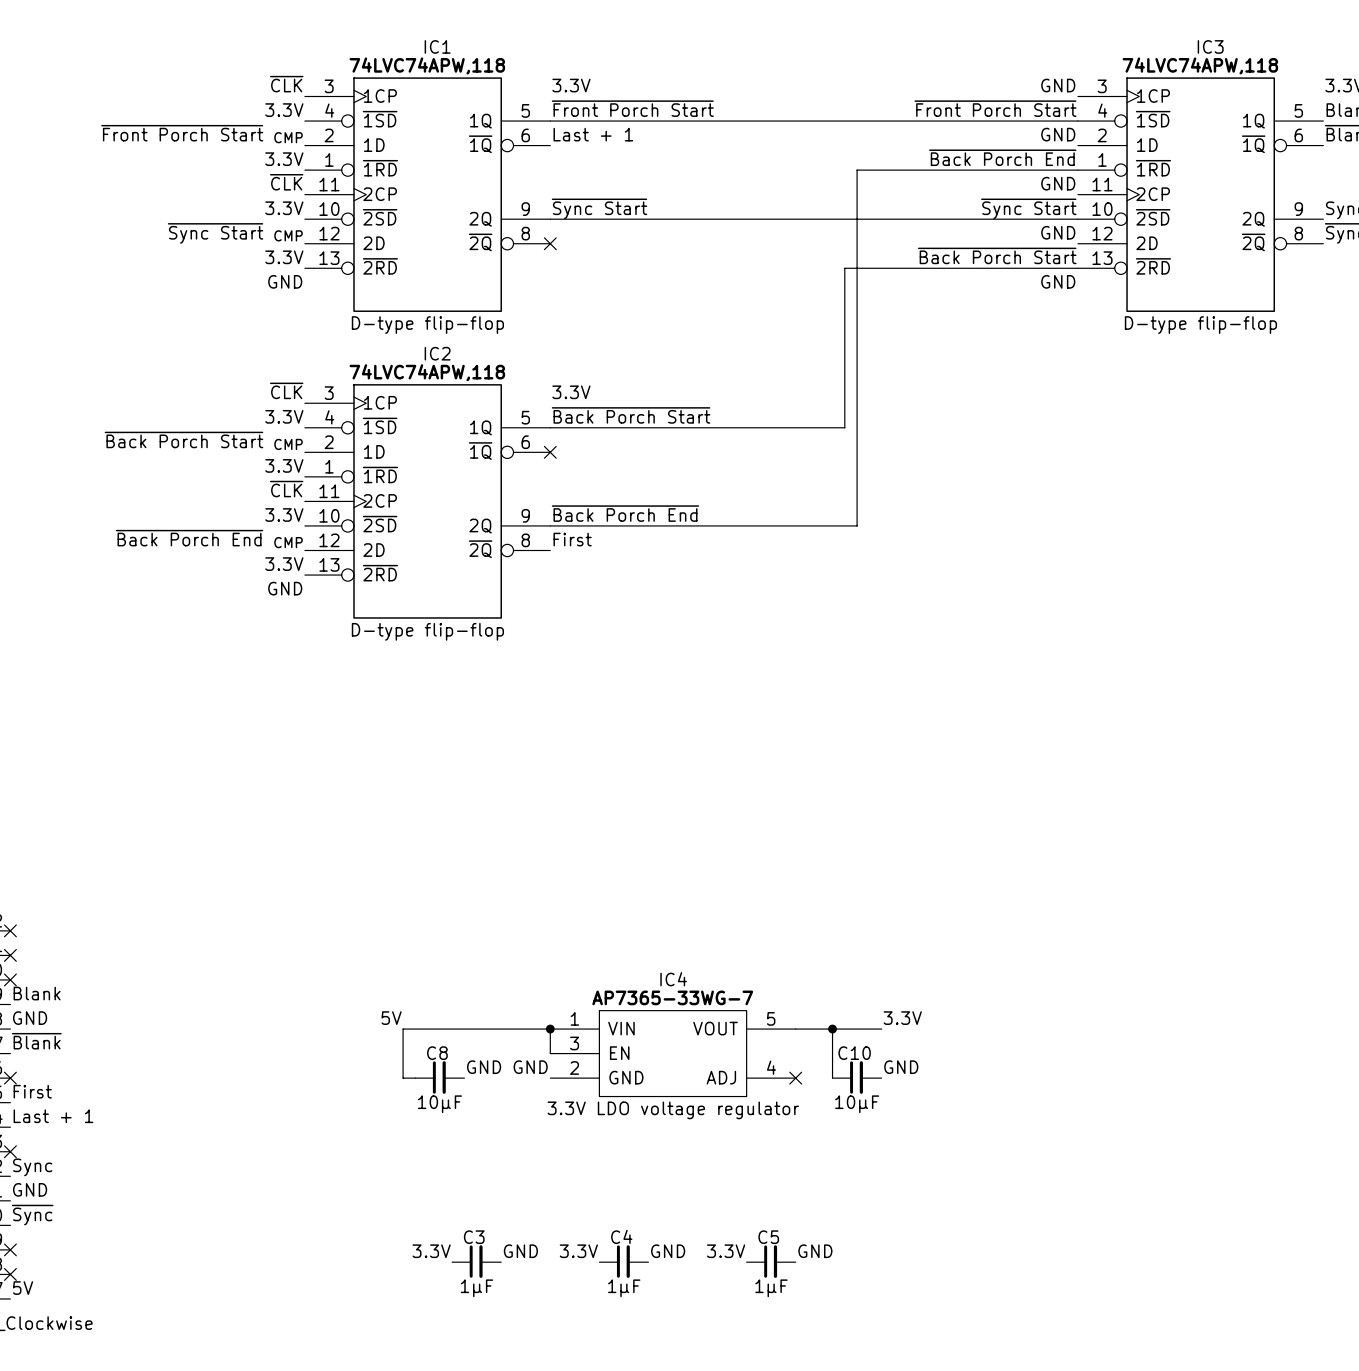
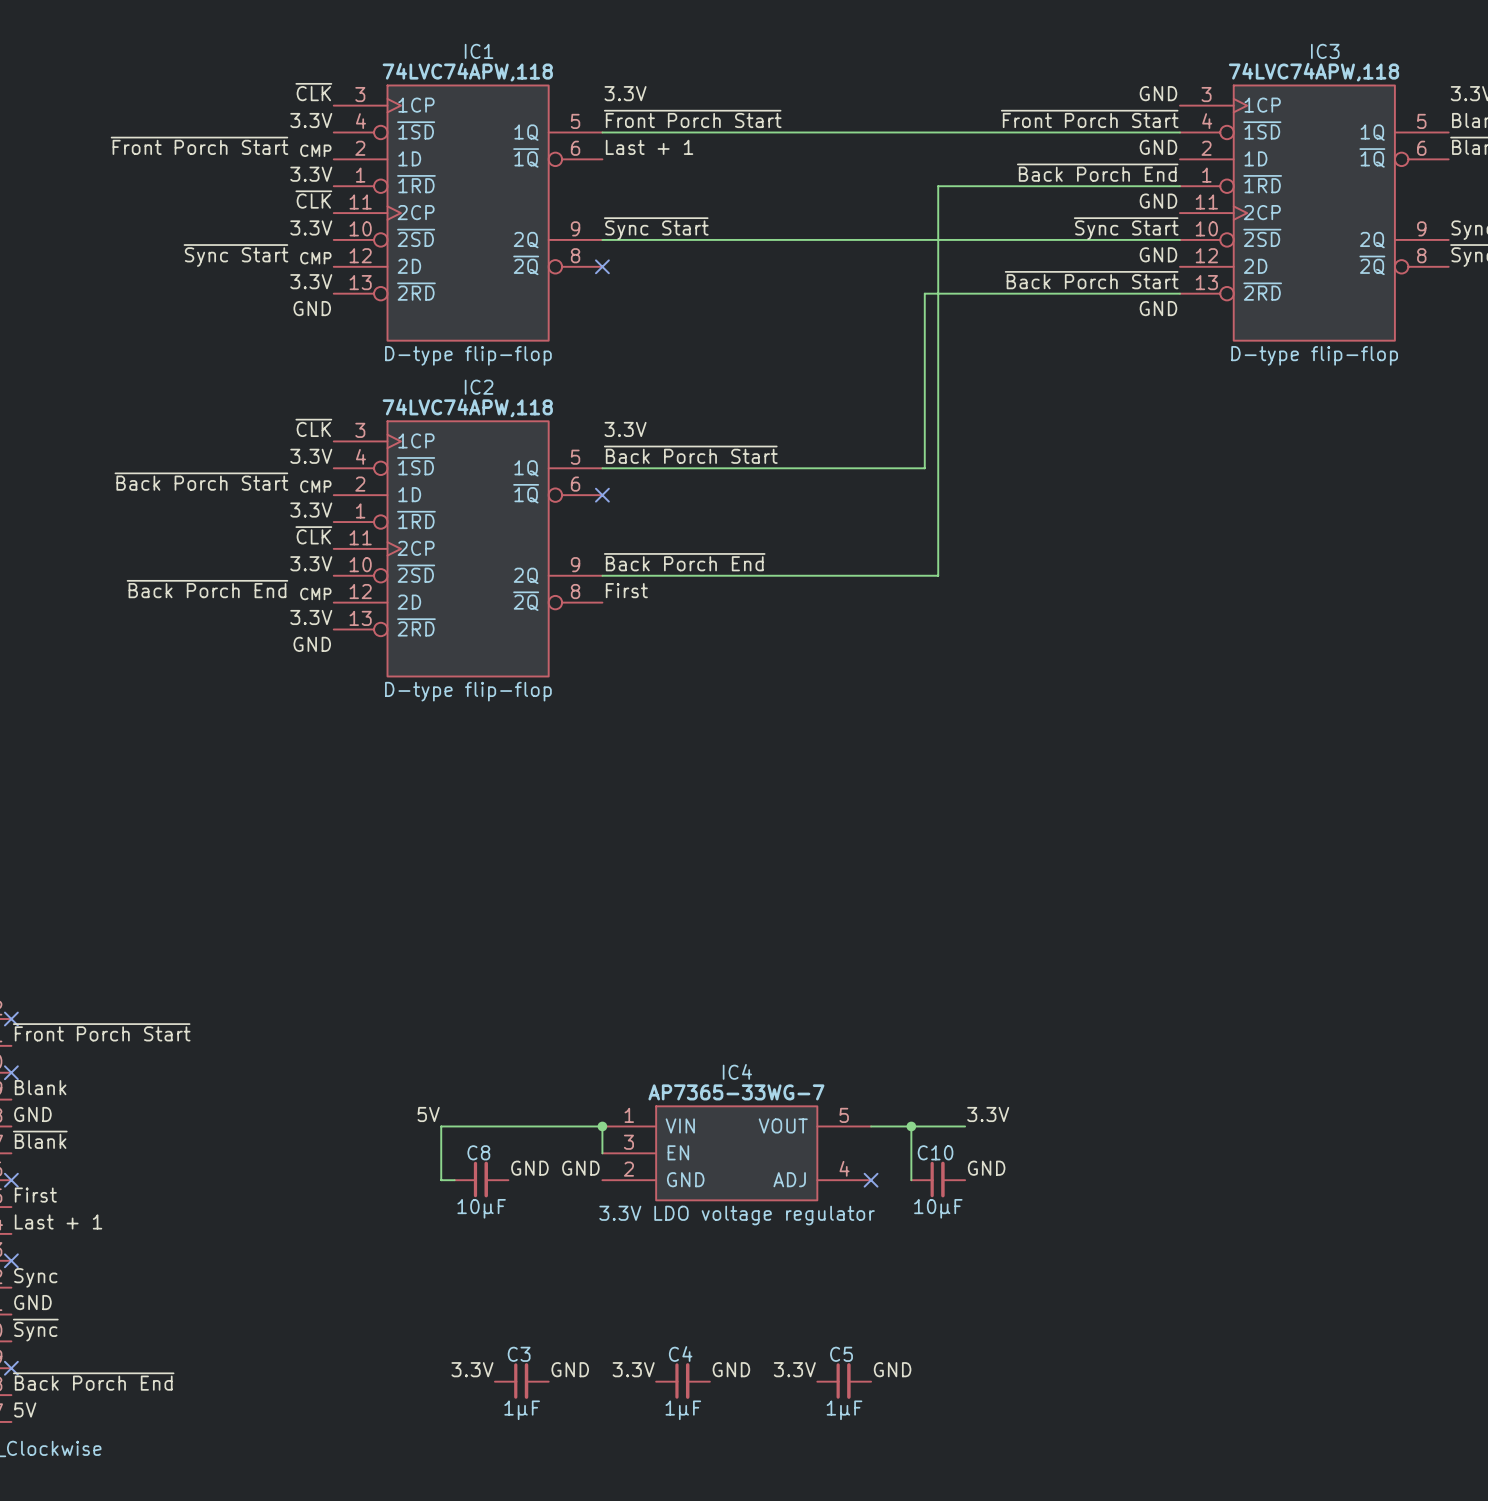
label: none -> ~{Front Porch Start} (101, 1032)
no-connect mark: (10, 955) -> none
label: none -> ~{Back Porch End} (93, 1381)
no-connect mark: (10, 1274) -> none

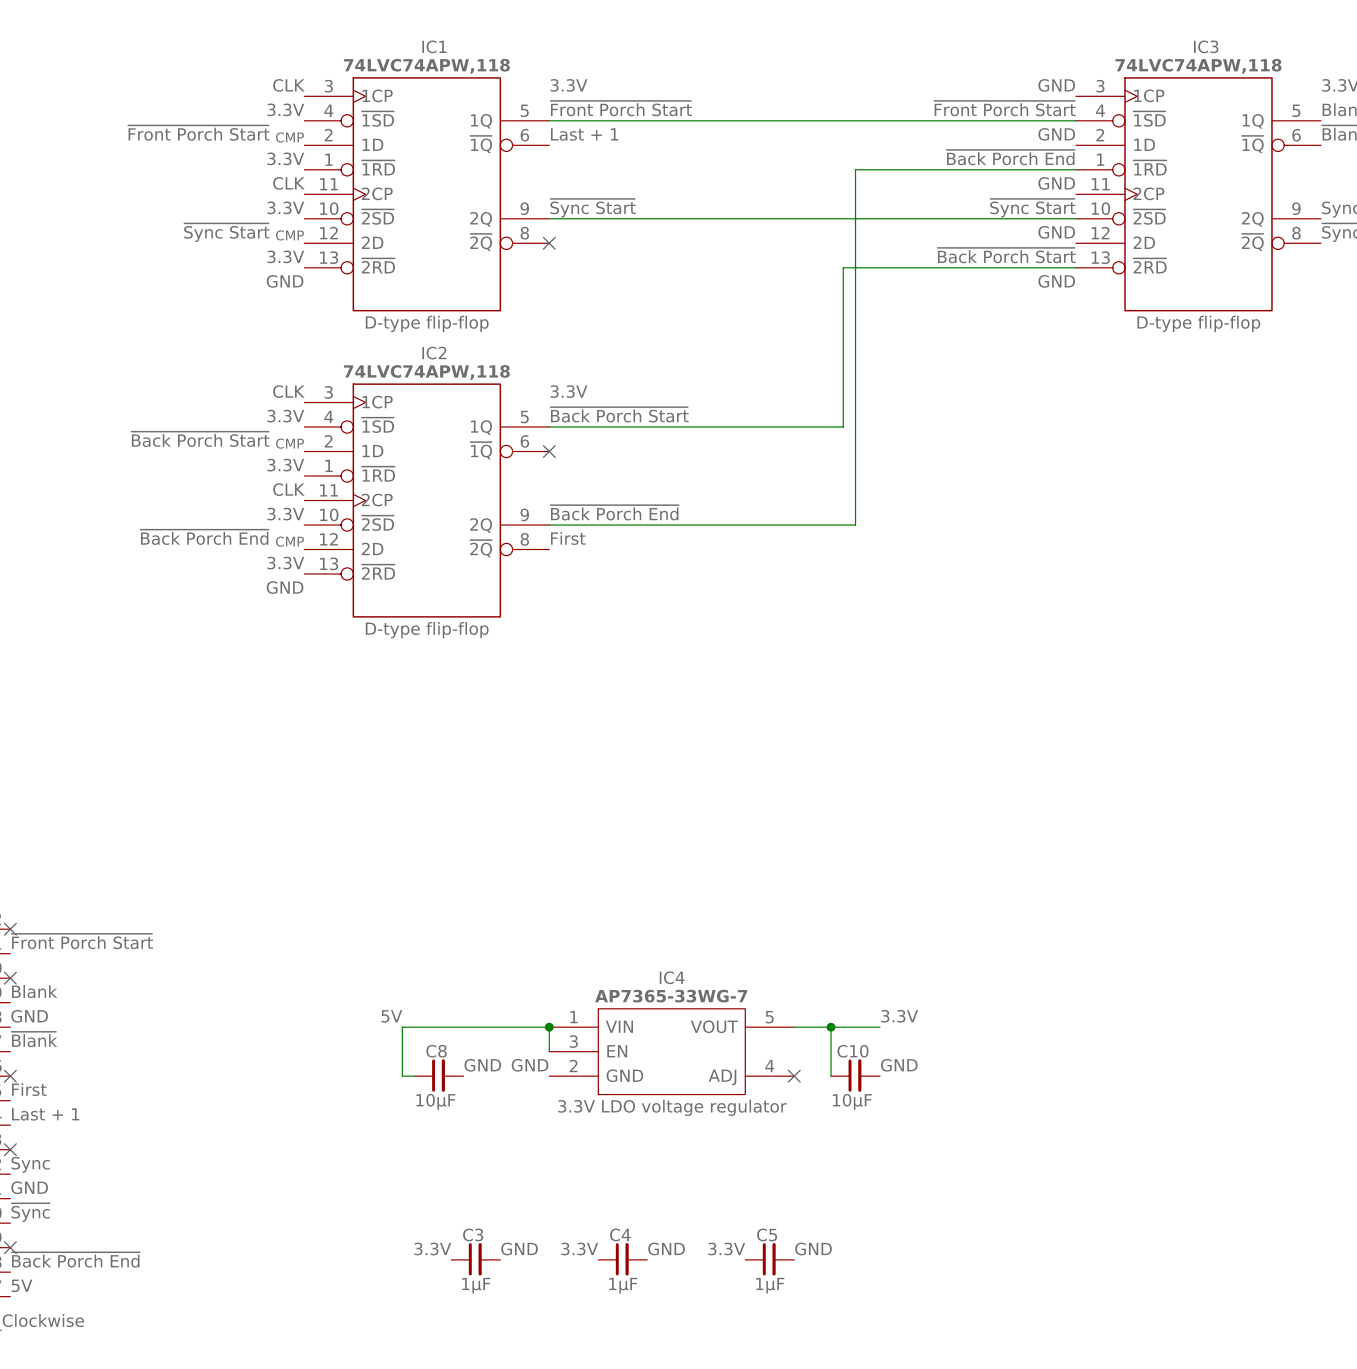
label: ~{CLK} (313, 92) -> CLK (288, 85)
label: ~{CLK} (313, 199) -> CLK (288, 183)
label: ~{CLK} (313, 427) -> CLK (288, 391)
label: ~{CLK} (313, 535) -> CLK (288, 489)

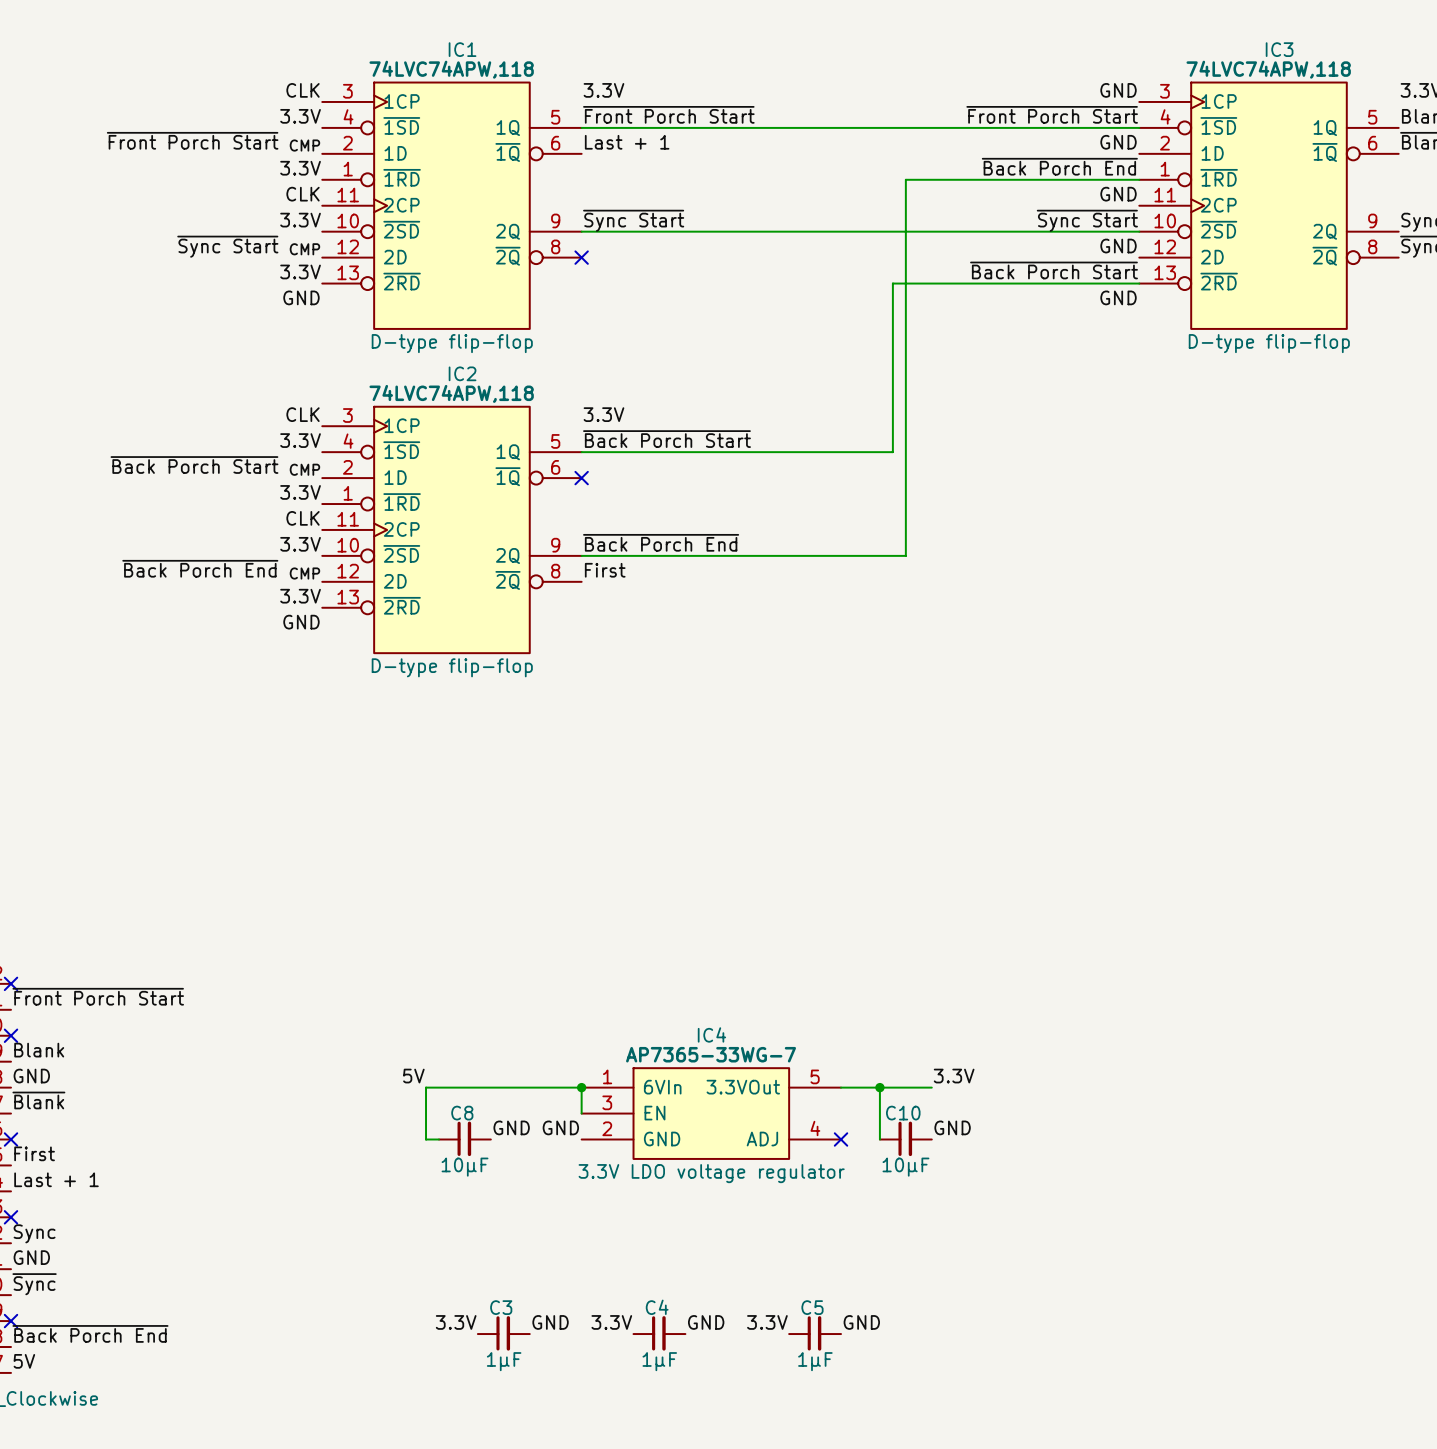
IC4 pin name: VIN (619, 1026) -> 6VIn (662, 1087)
IC4 pin name: VOUT (714, 1026) -> 3.3VOut (743, 1087)

